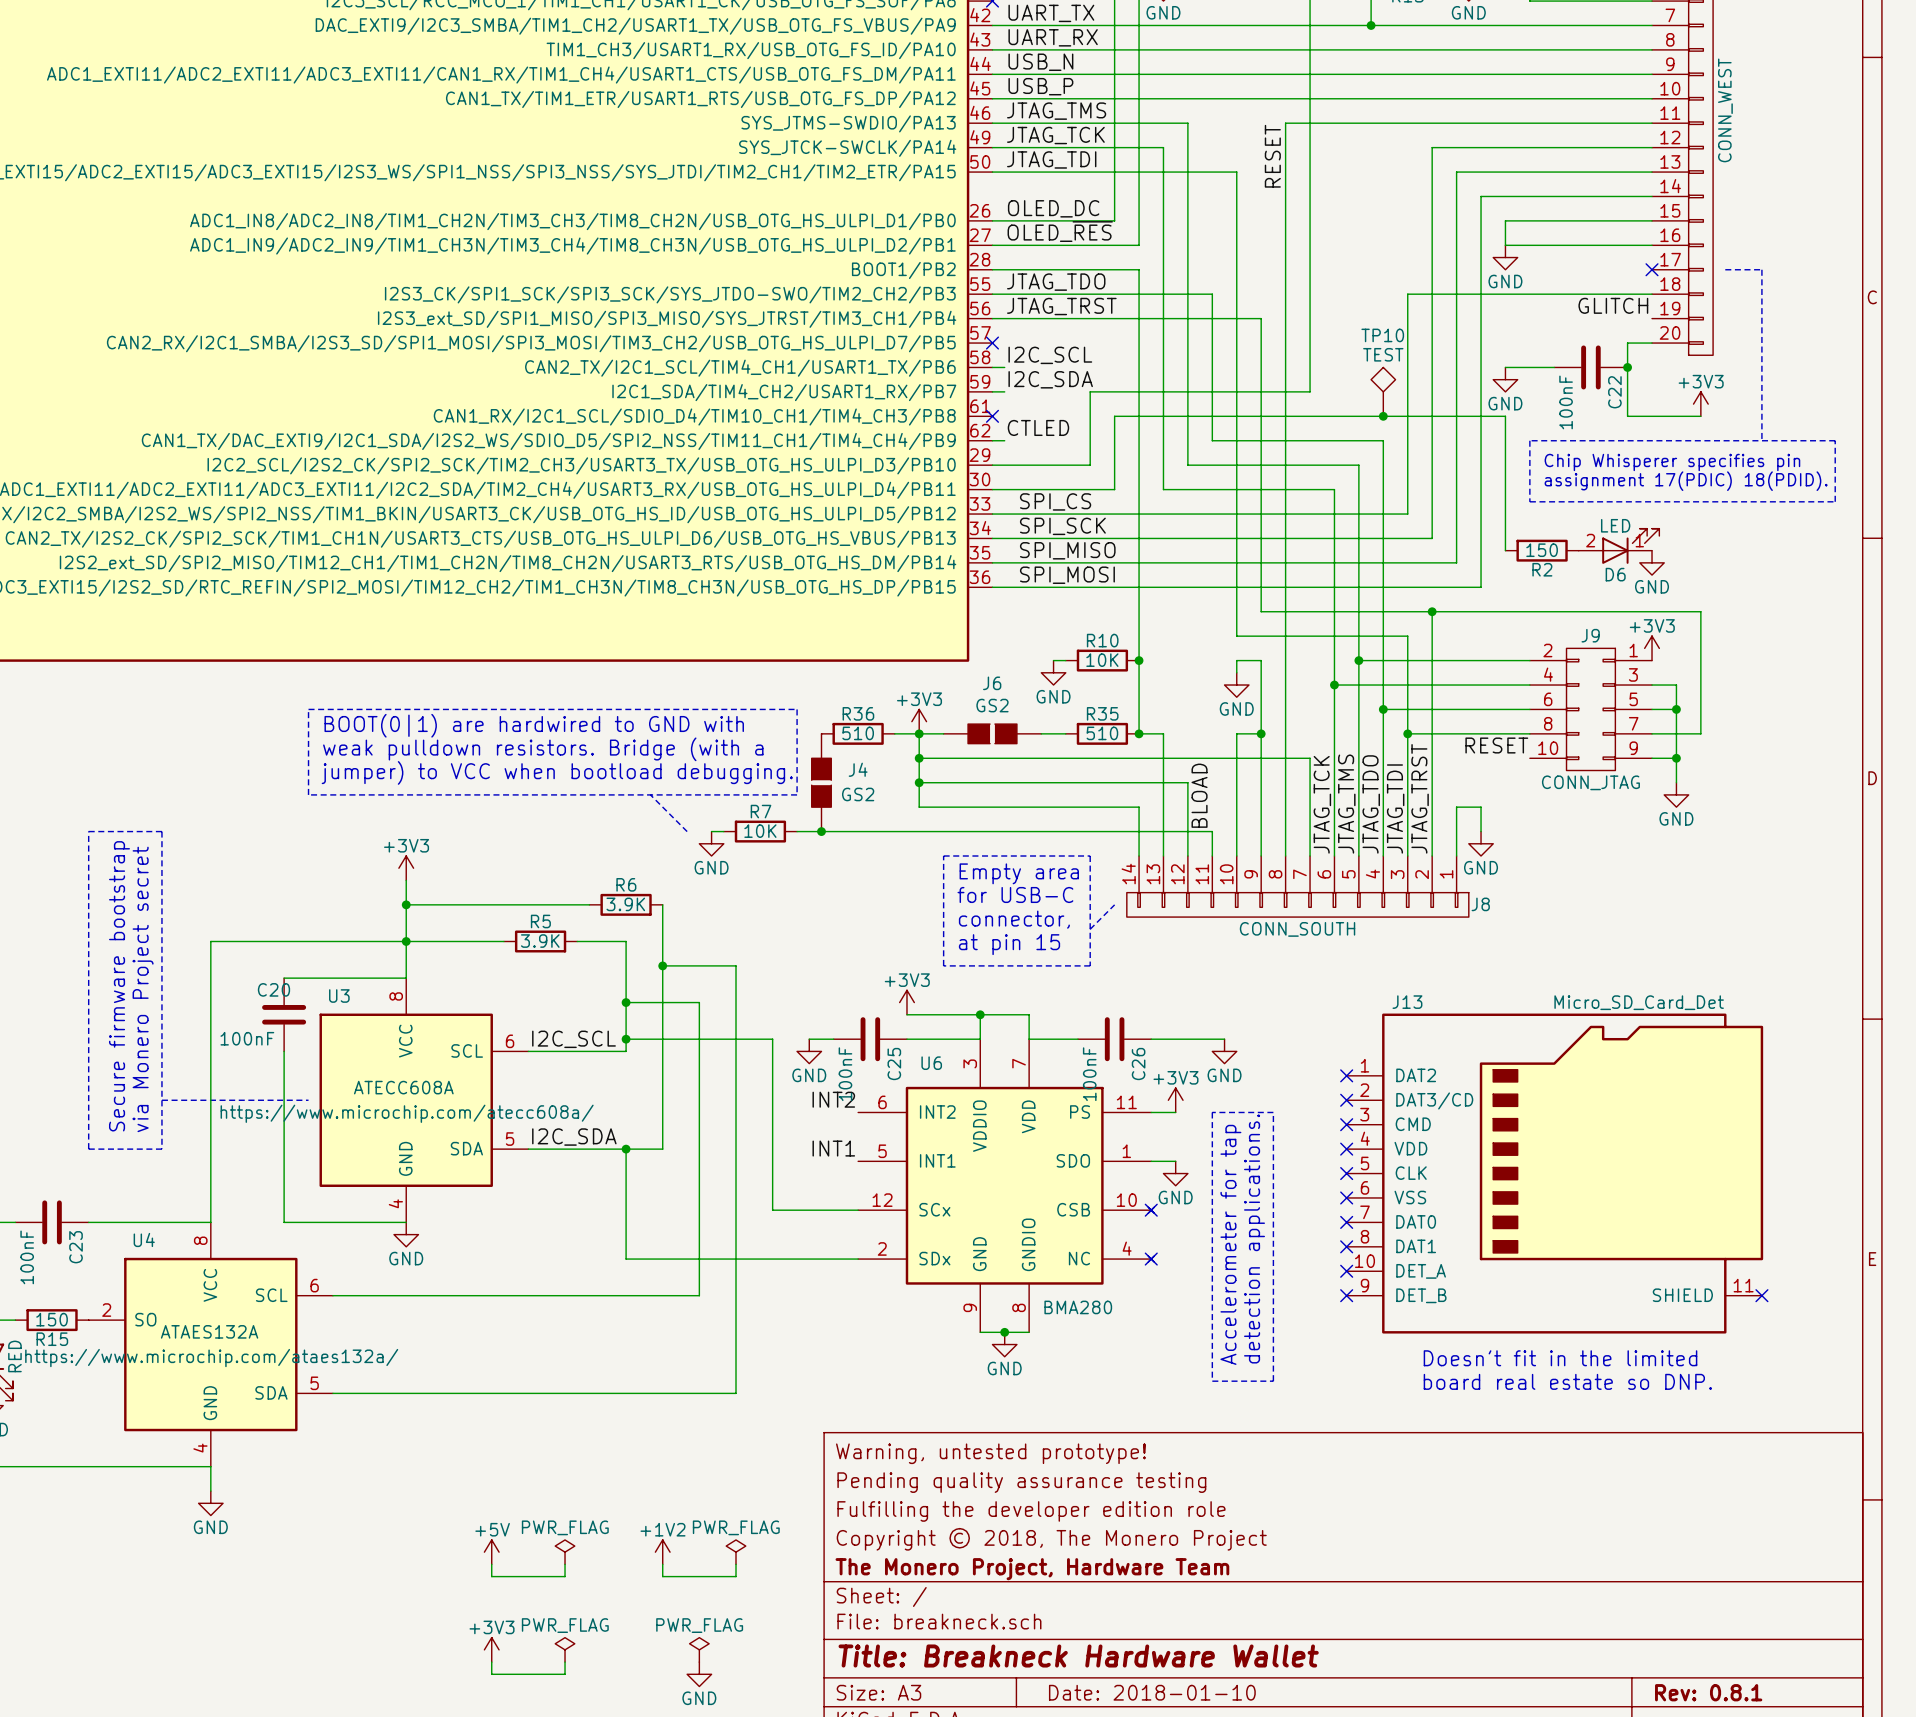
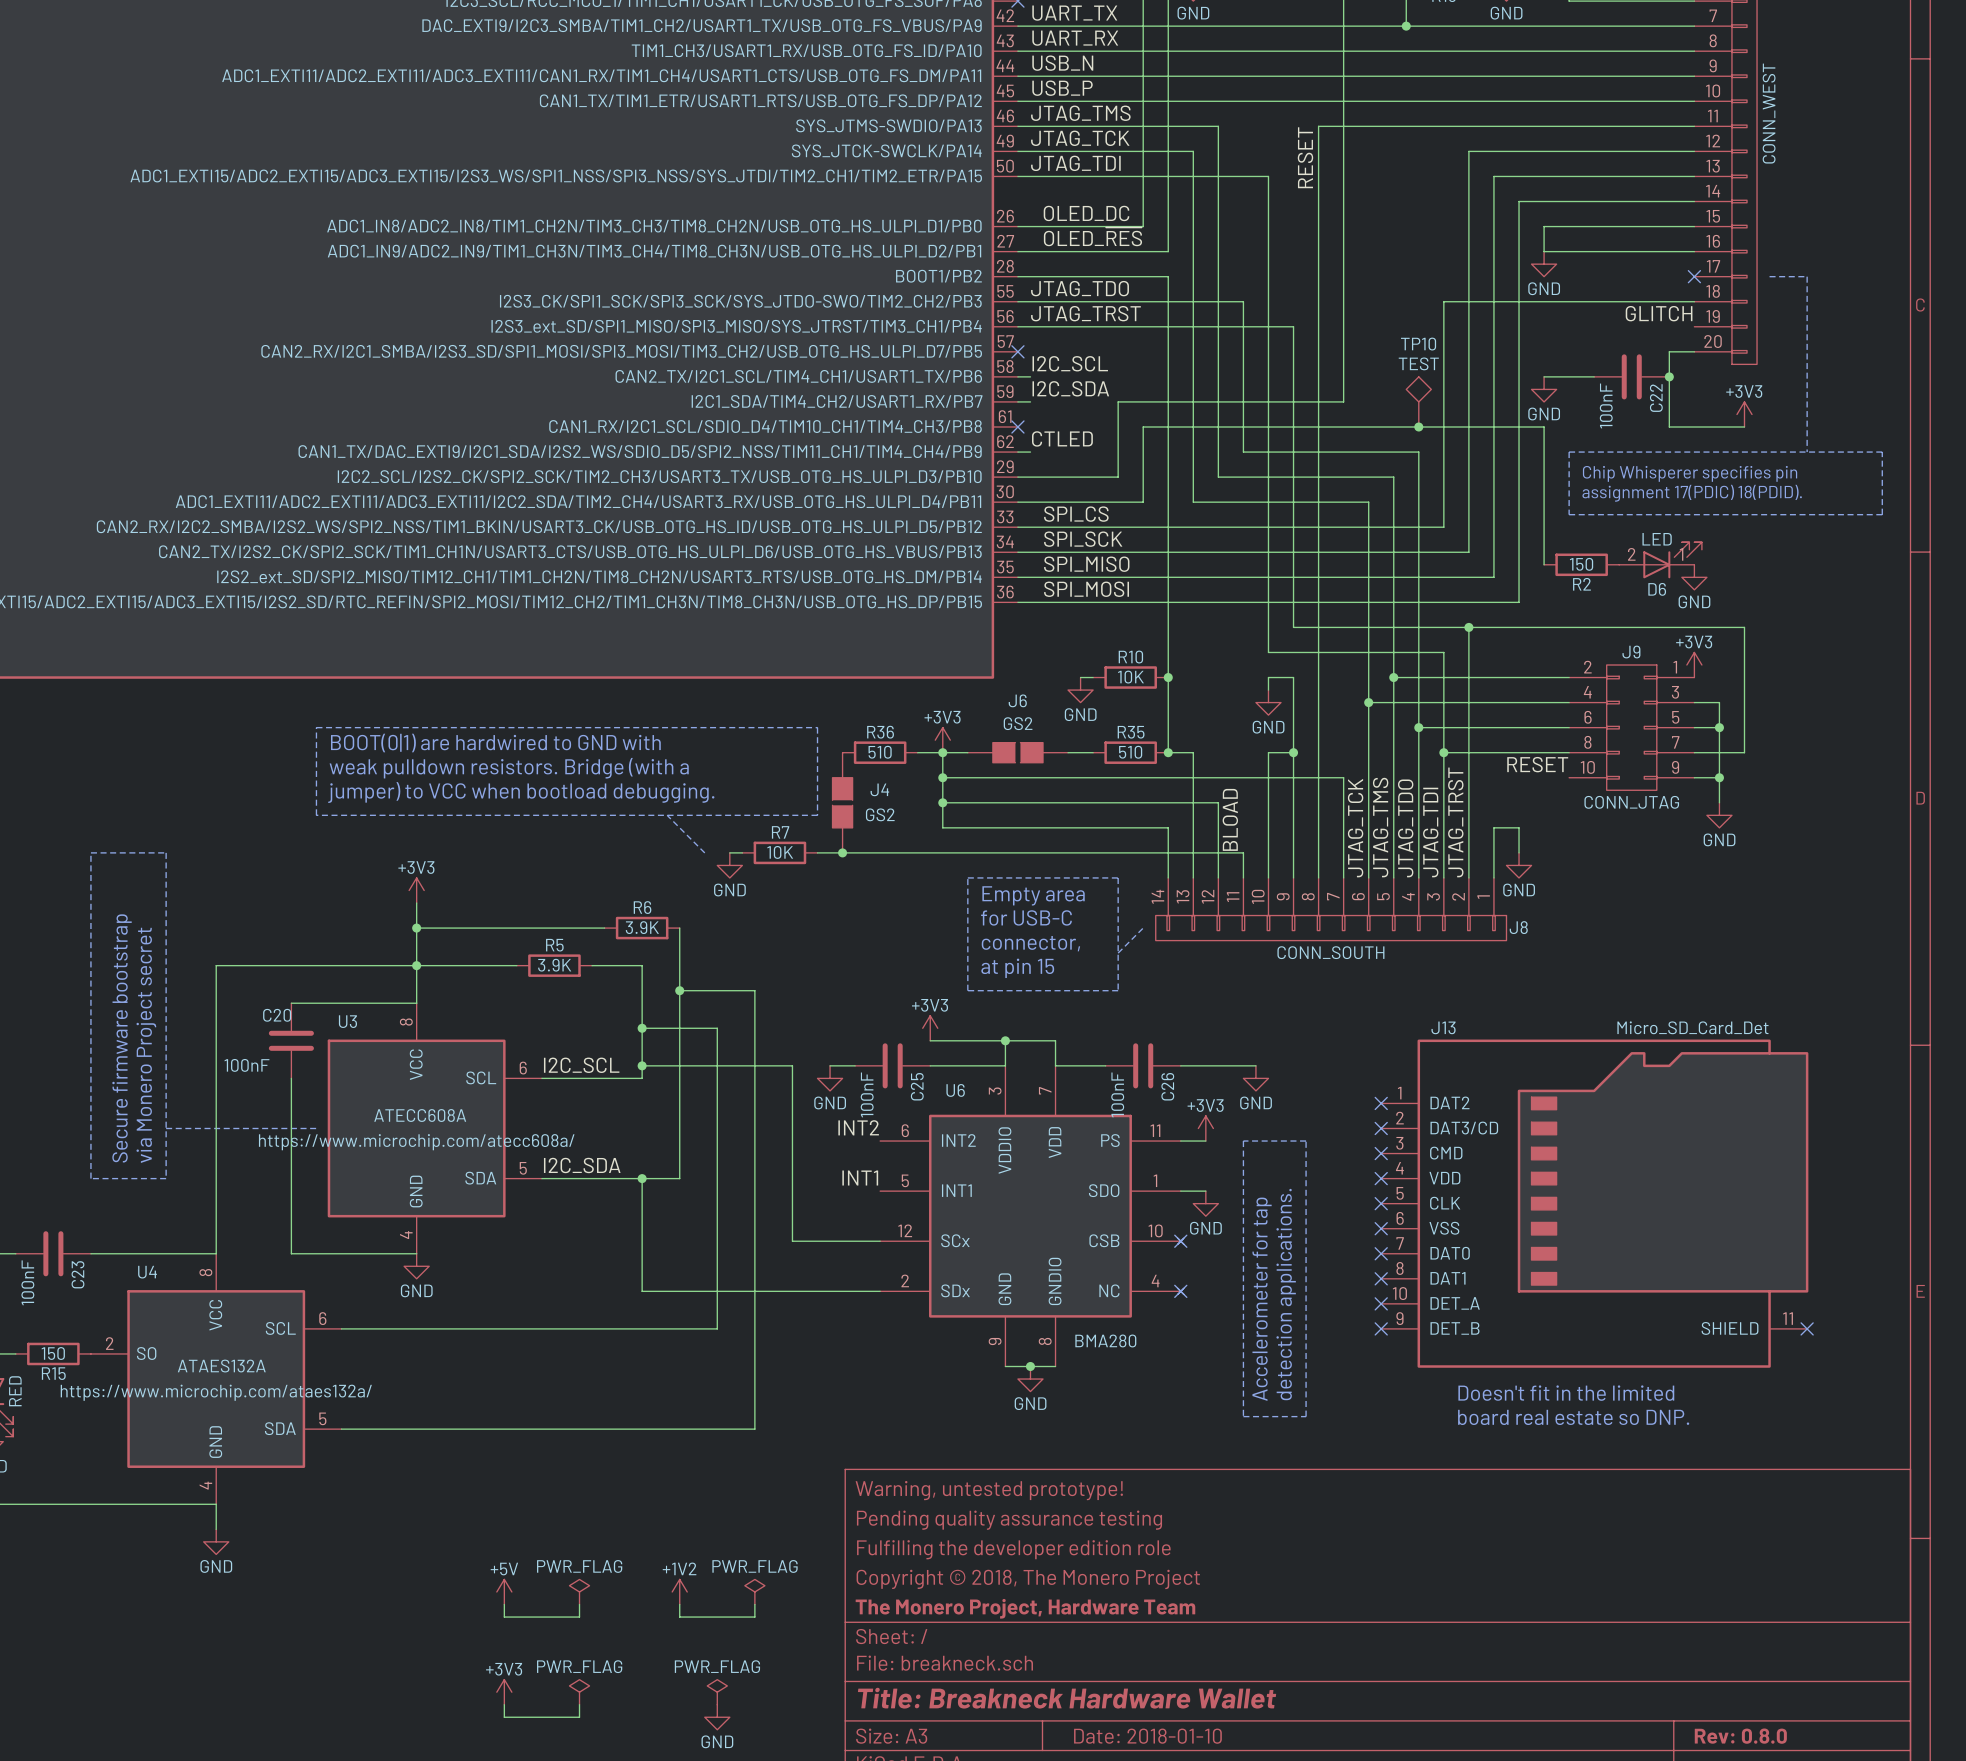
title block: Rev: 0.8.1 (1708, 1692) -> Rev: 0.8.0 (1740, 1736)

